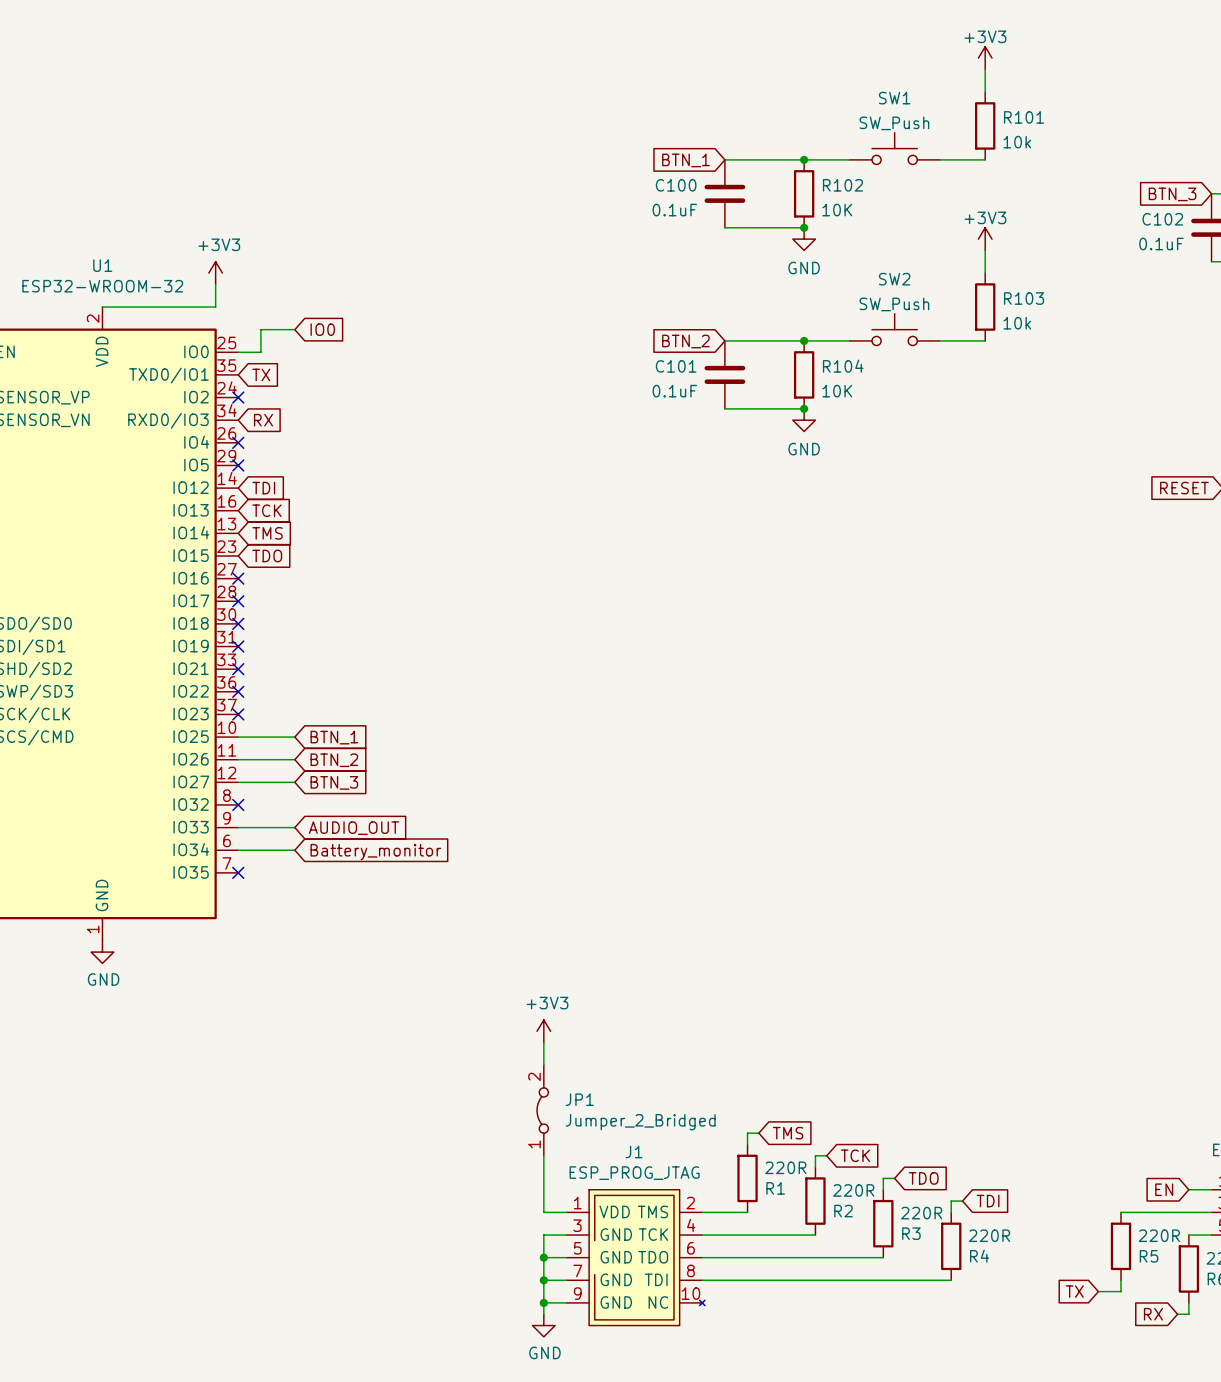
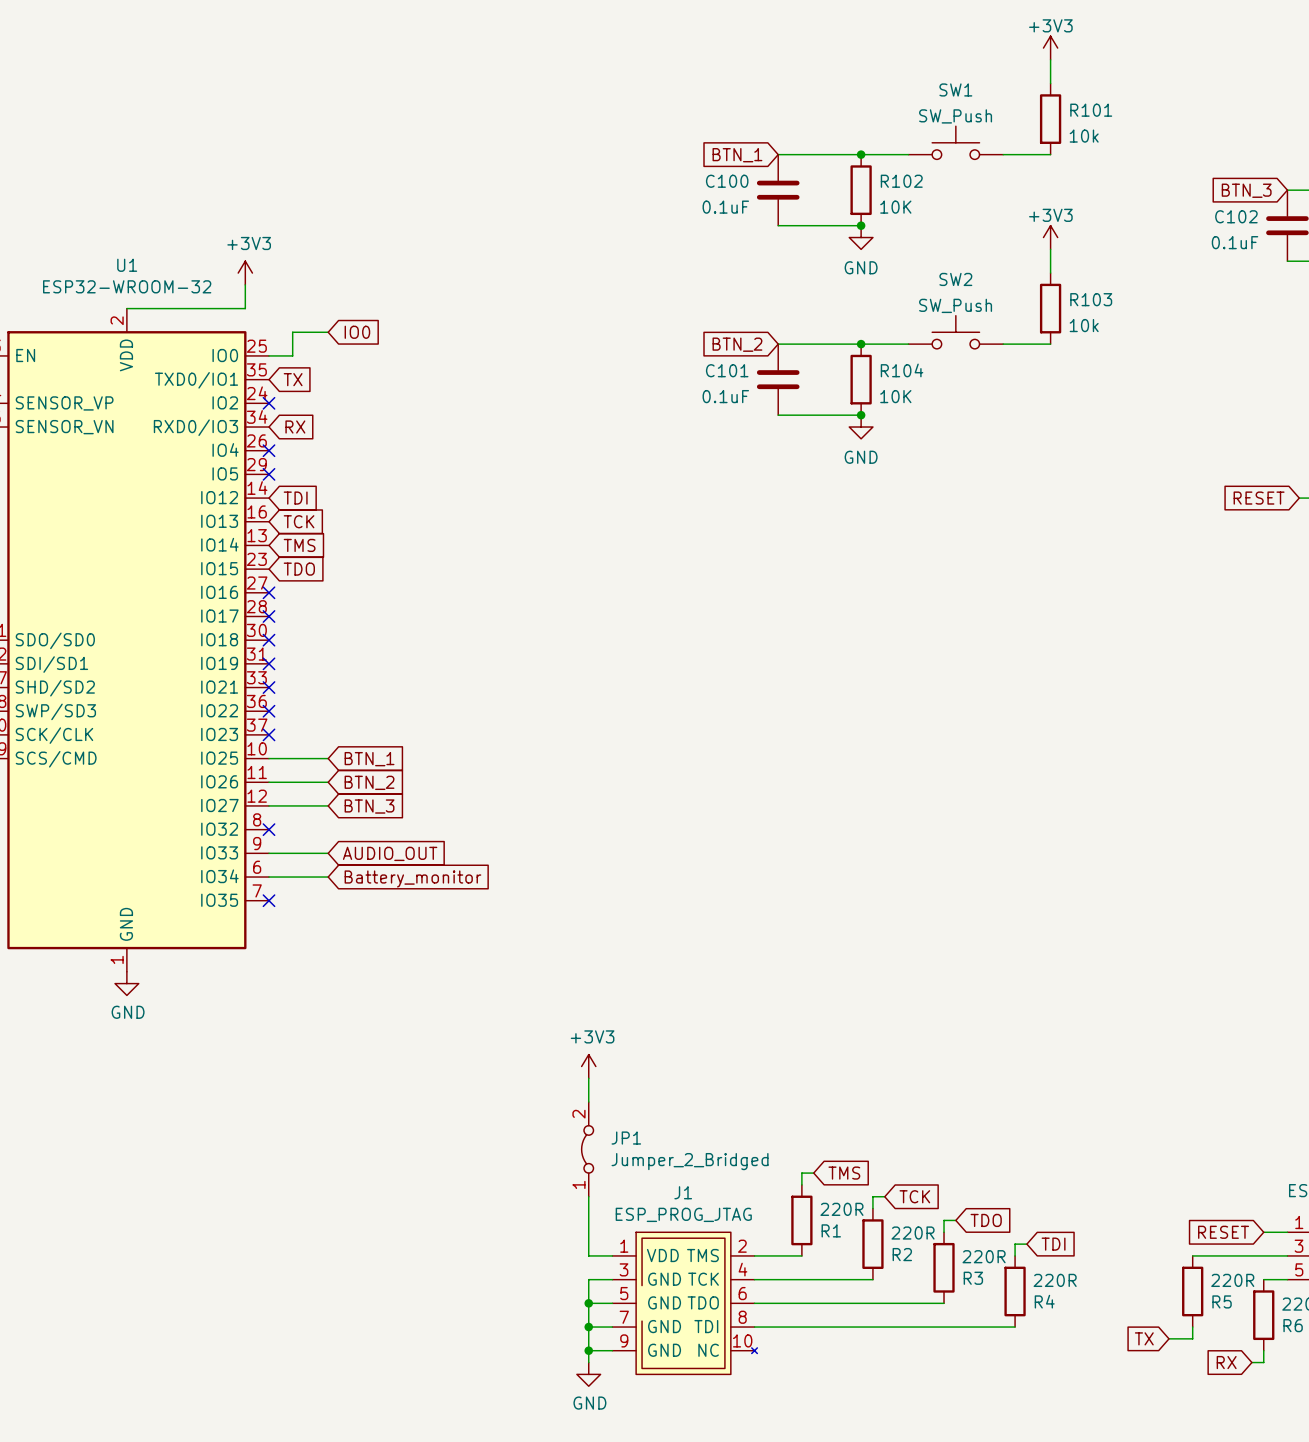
global label: EN (1164, 1189) -> RESET (1223, 1232)

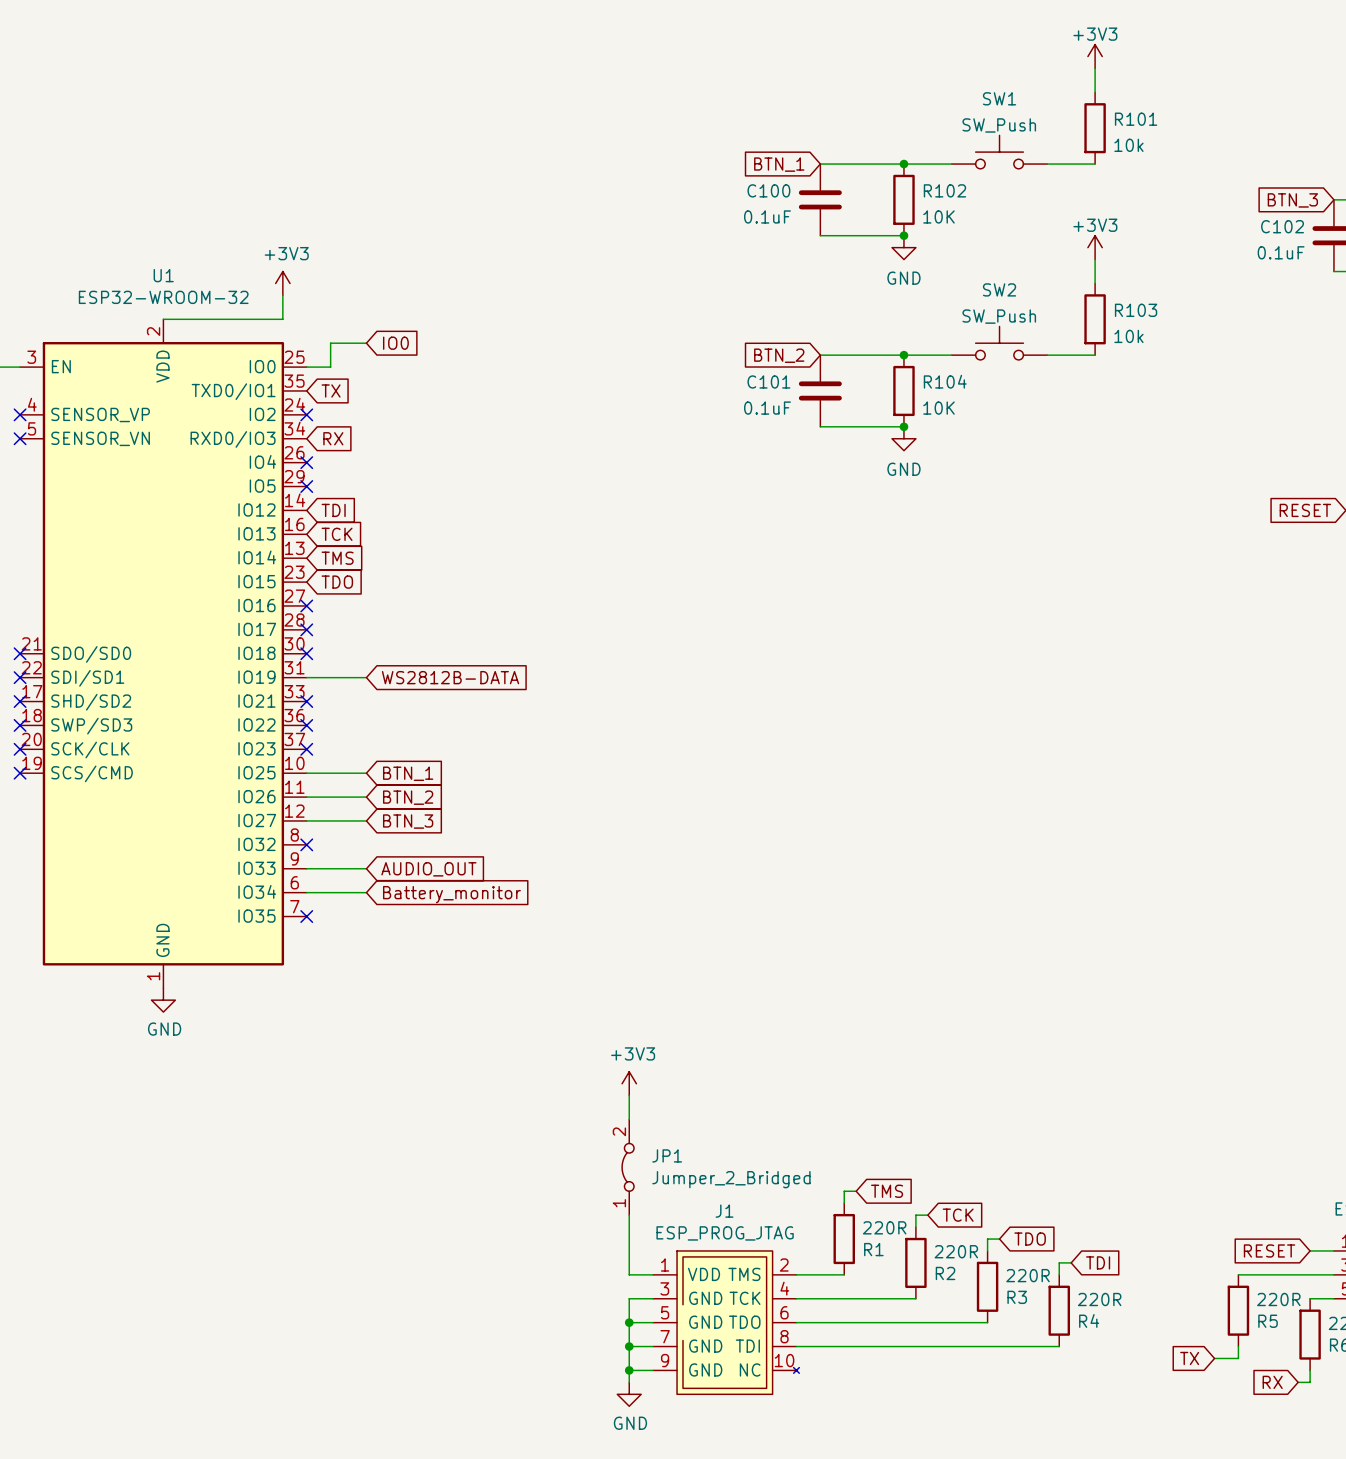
wire: none -> (306, 677) (366, 677)
no-connect mark: (269, 663) -> none
global label: none -> WS2812B-DATA (450, 677)

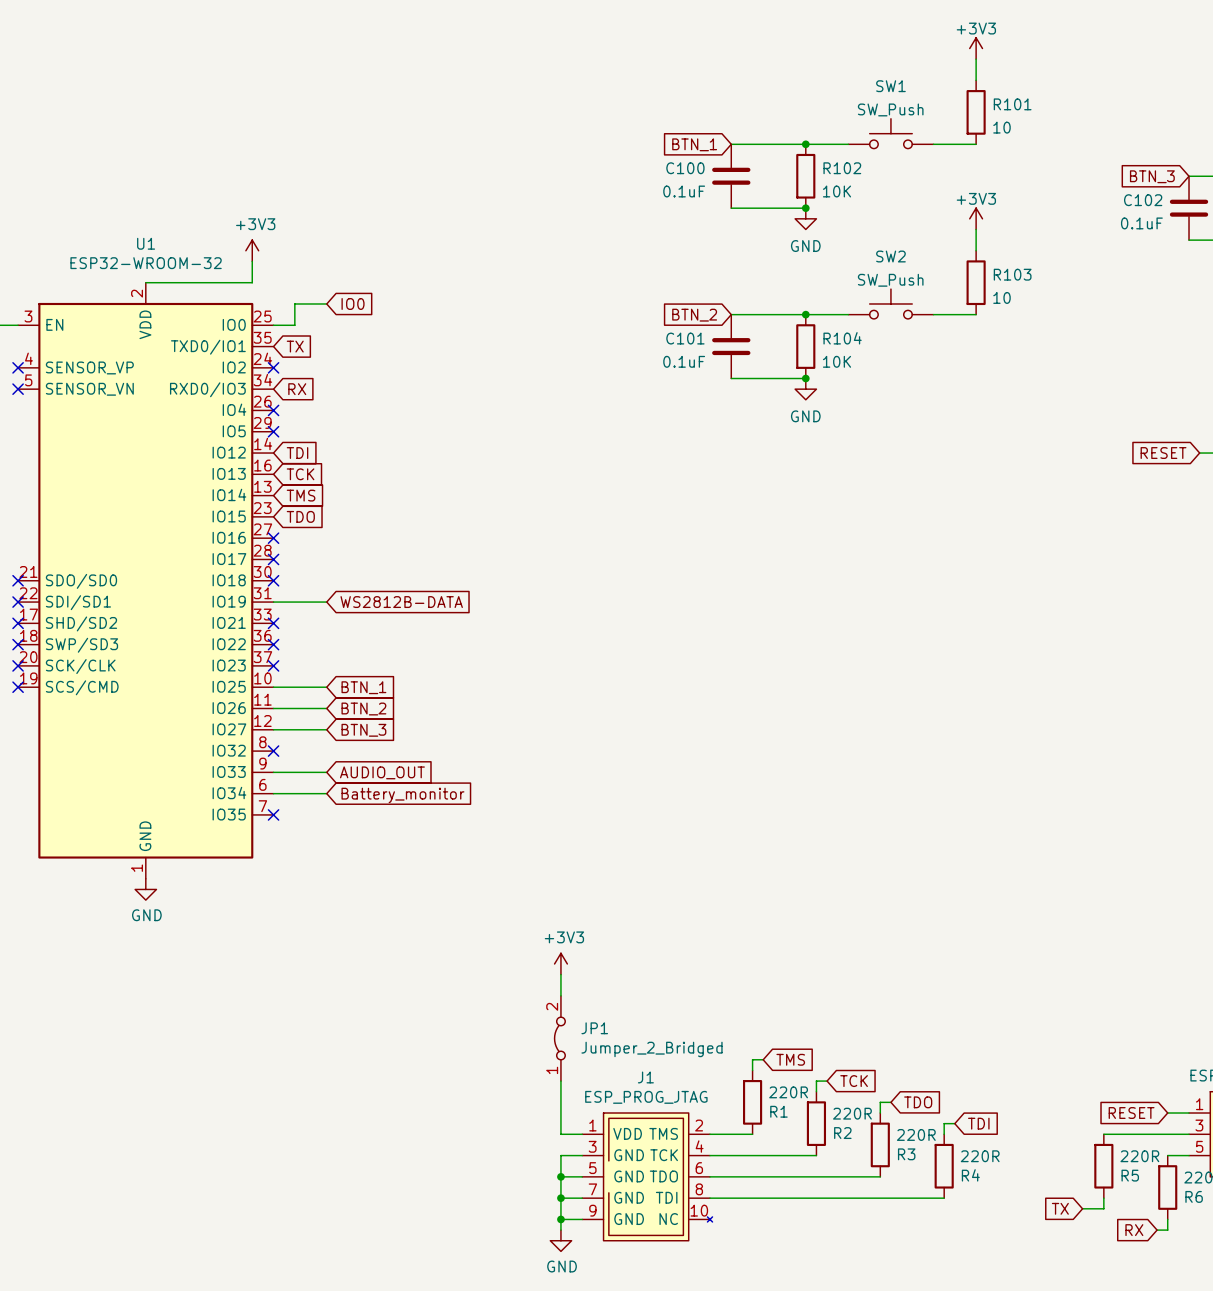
R101 value: 10k (1128, 145) -> 10 (1001, 127)
R103 value: 10k (1128, 336) -> 10 (1001, 297)

